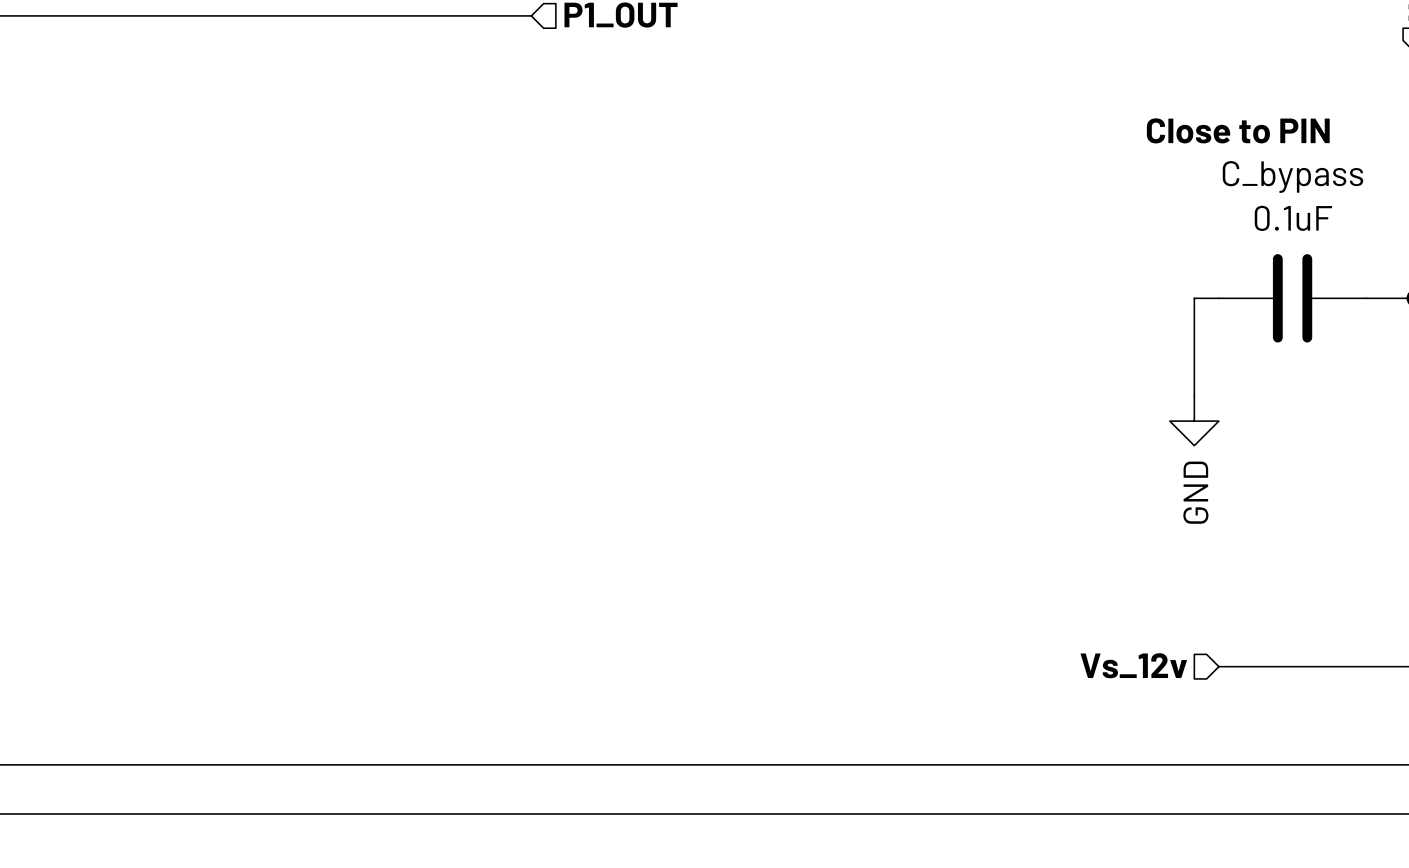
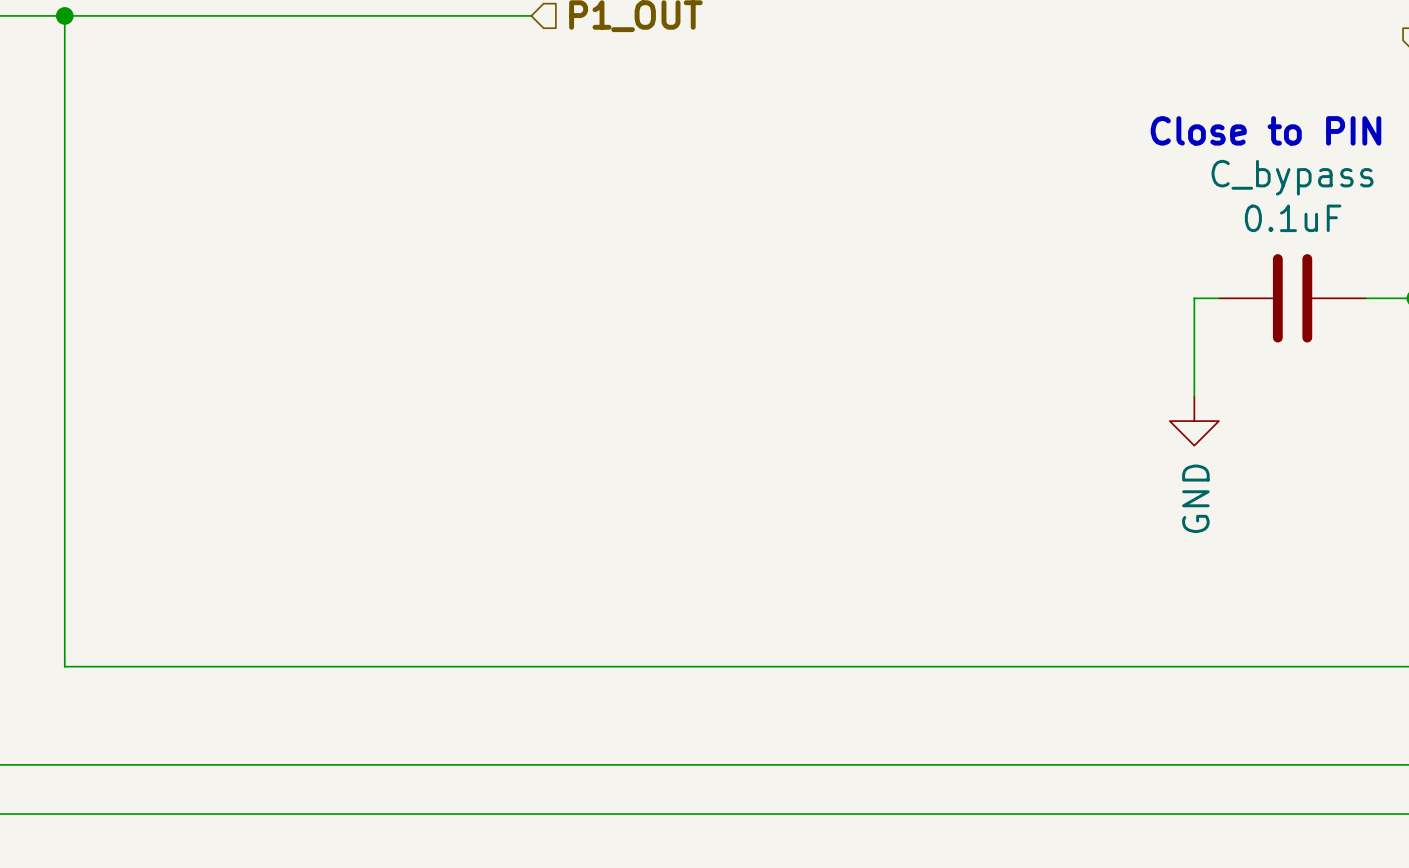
wire: none -> (64, 15) (64, 666) (1218, 666)
junction: none -> (64, 15)
hierarchical label: Vs_12v (1133, 665) -> none

